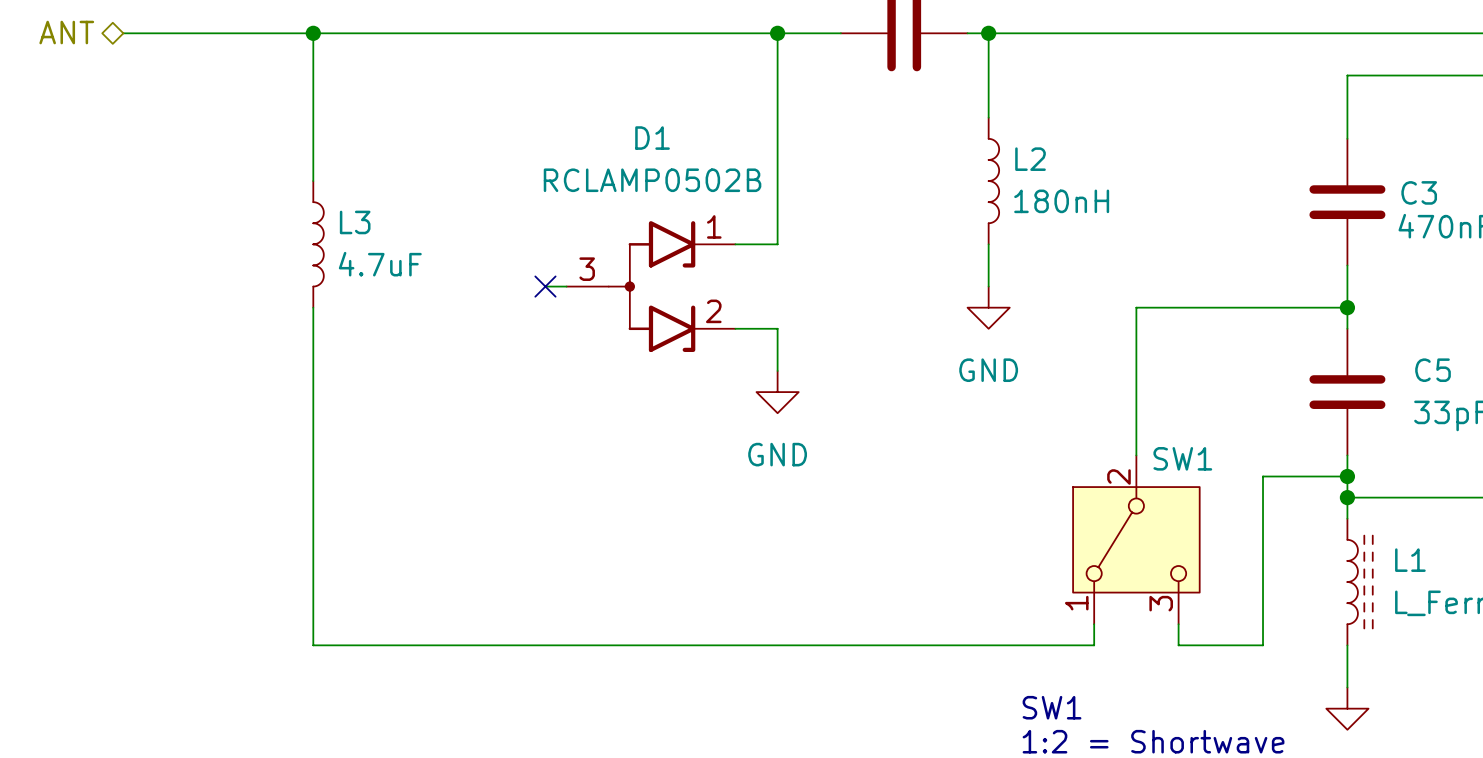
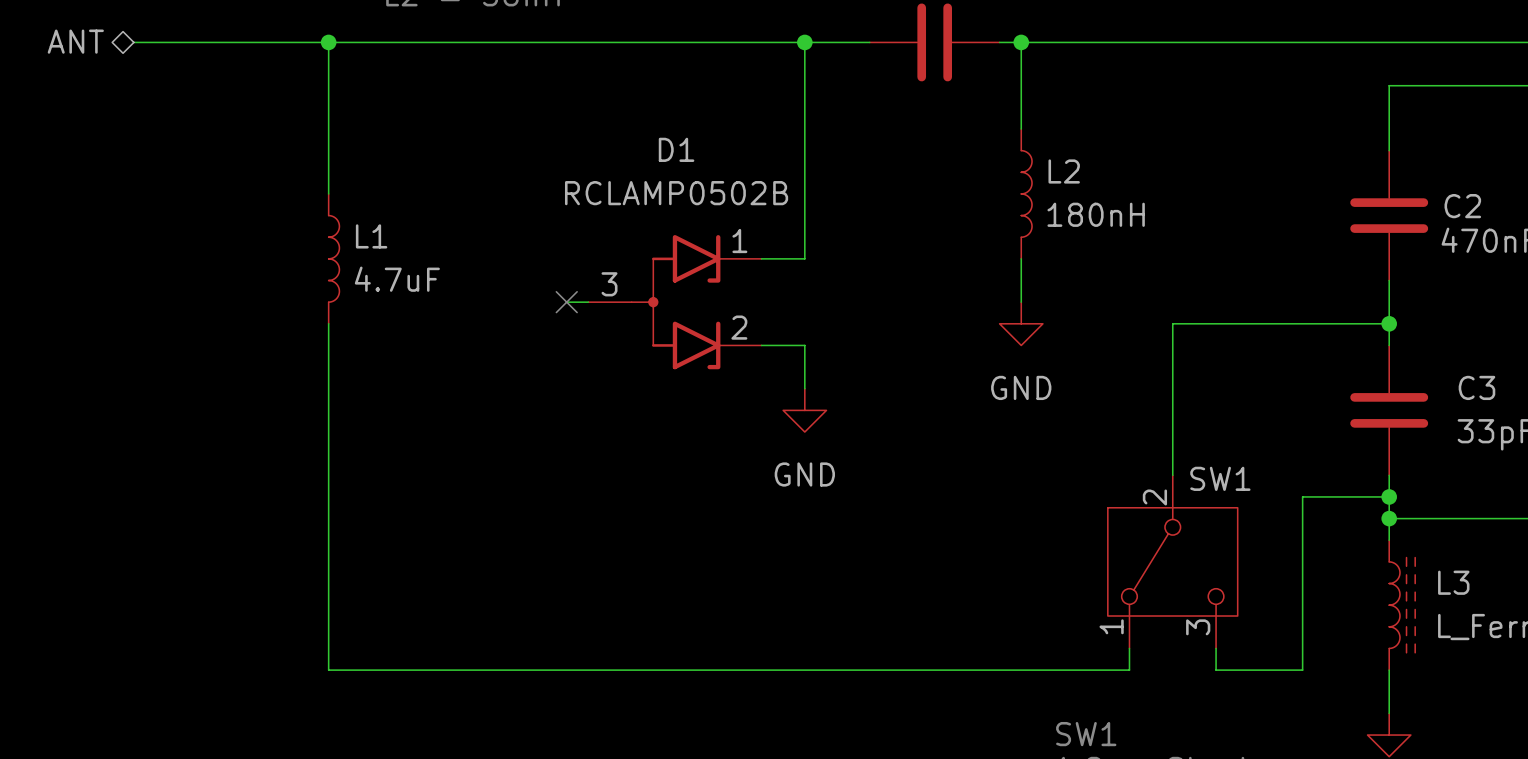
C3 name: C3 (1419, 192) -> C2 (1462, 206)
L3 name: L3 (355, 222) -> L1 (371, 236)
C5 name: C5 (1433, 370) -> C3 (1476, 387)
L1 name: L1 (1410, 560) -> L3 (1453, 582)

